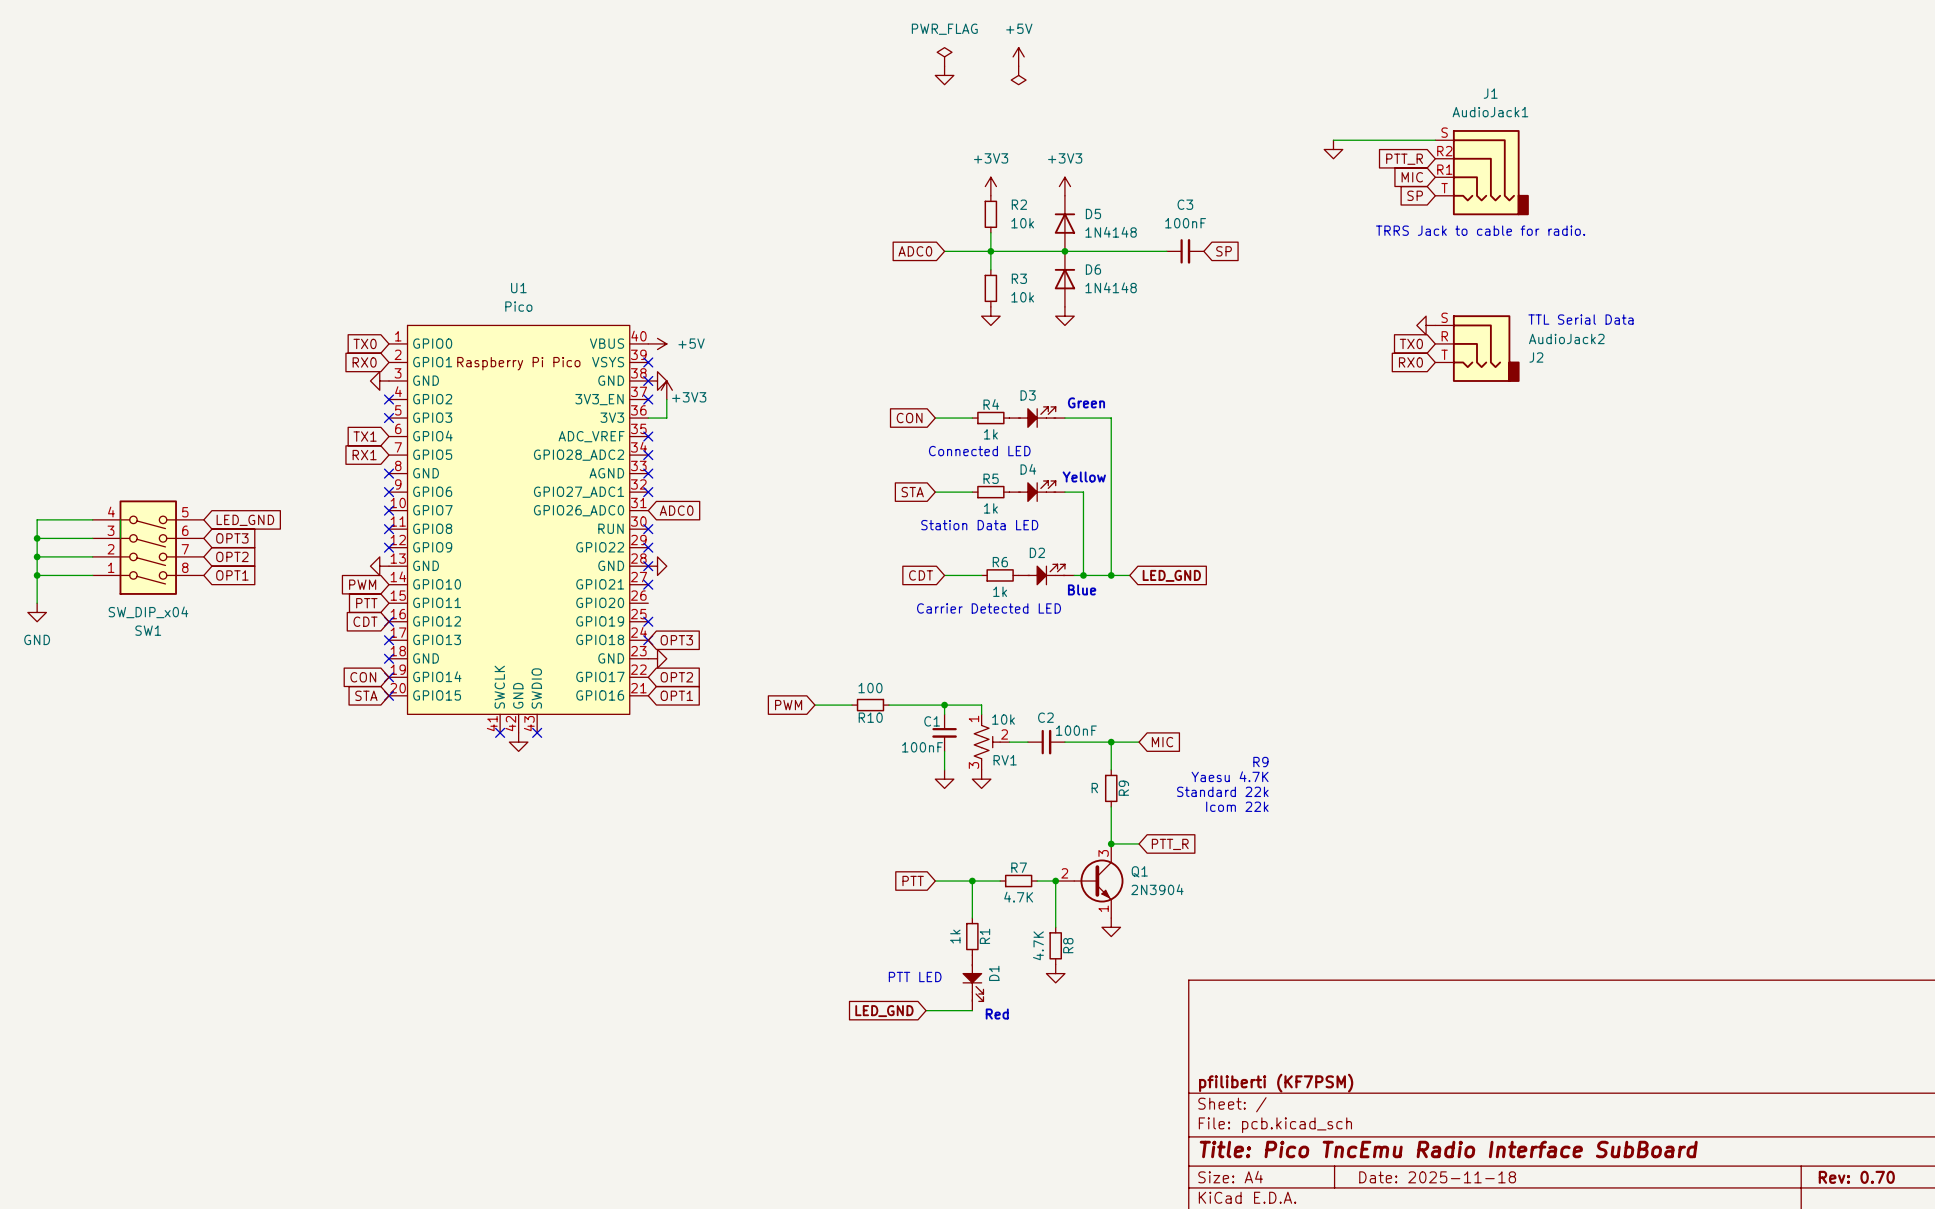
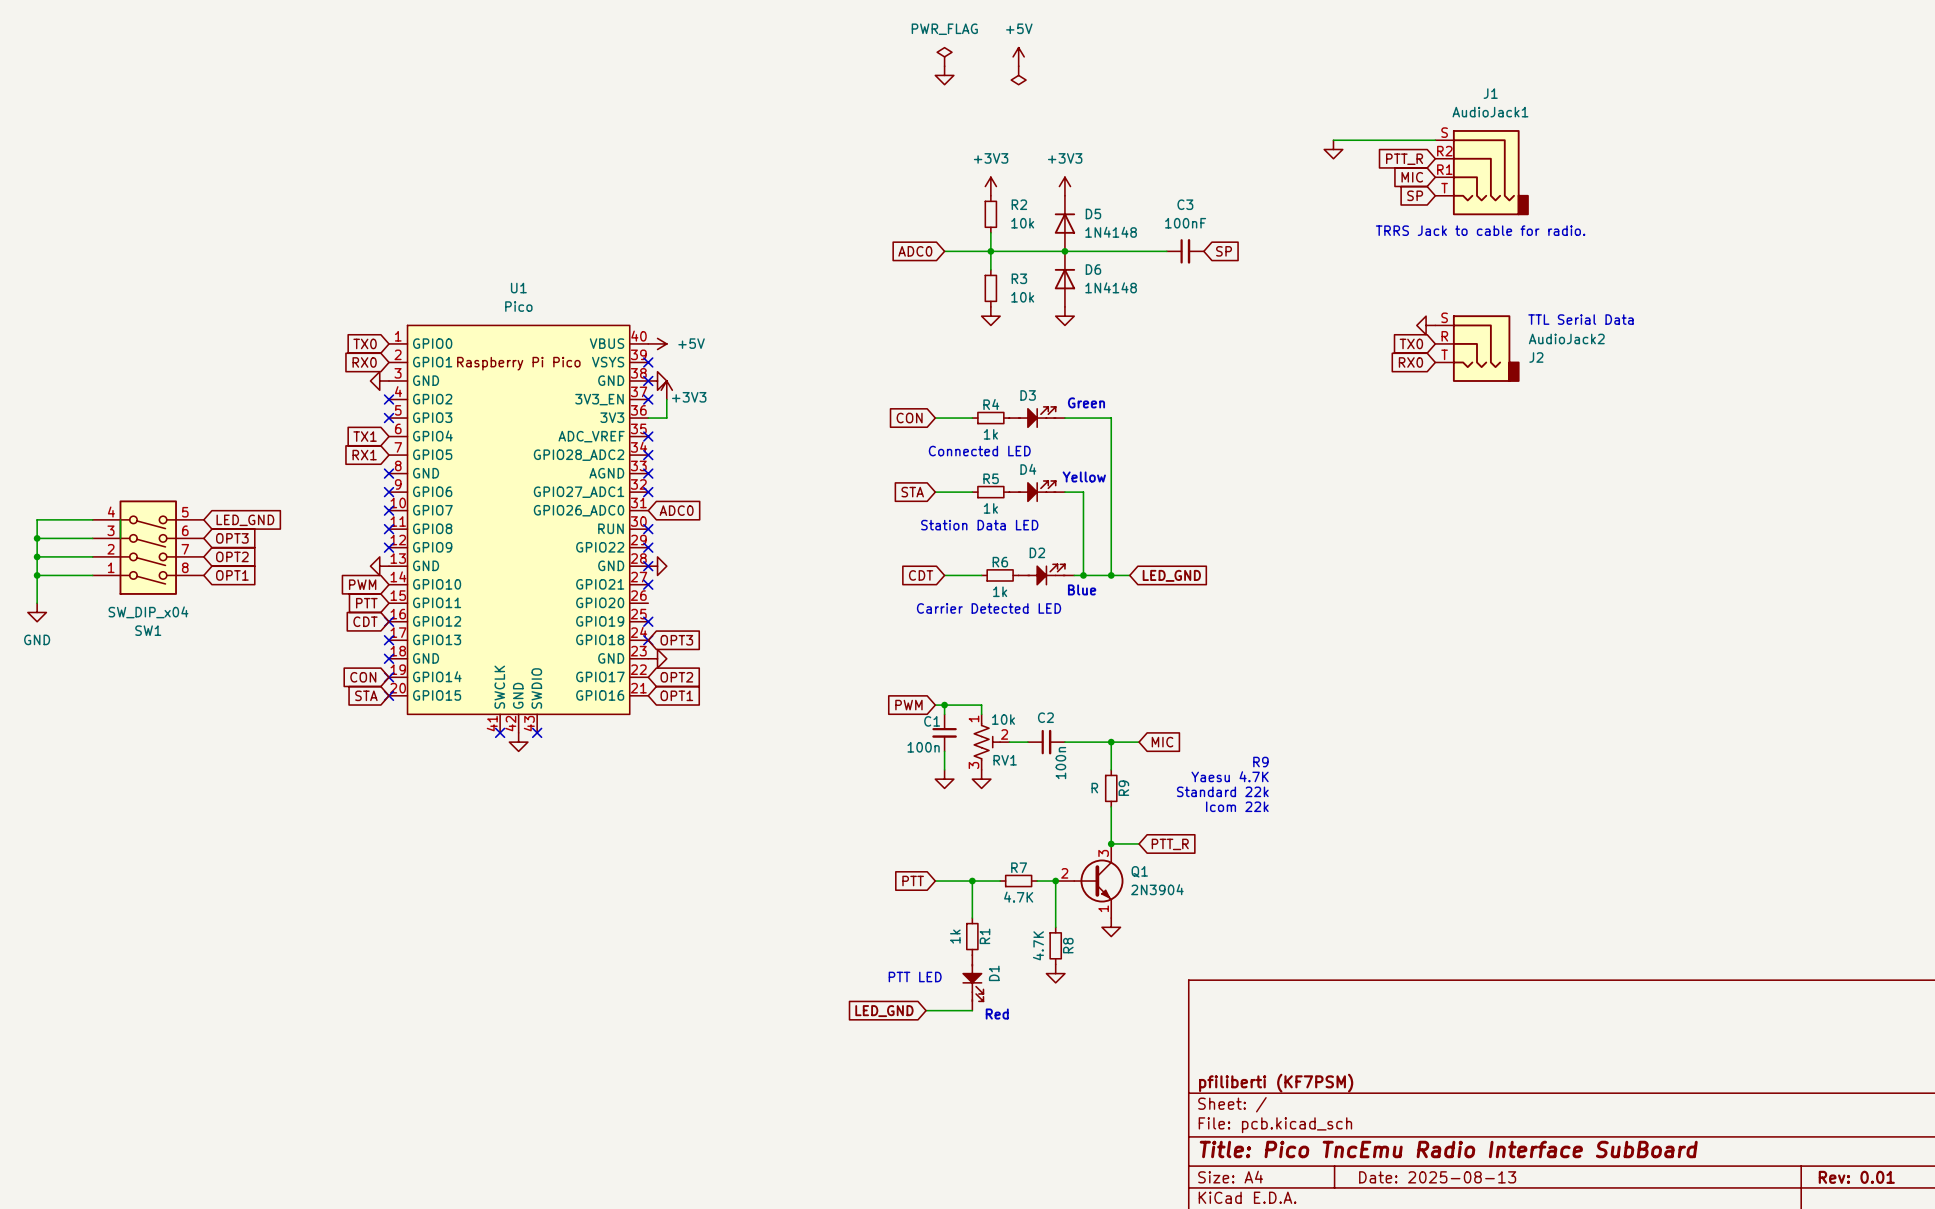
global label position: PWM (788, 705) -> PWM (908, 705)
wire: (814, 705) (851, 705) -> none
R10: 100 (870, 705) -> none
wire: (889, 705) (935, 705) -> none
C2 value: 100nF (1076, 730) -> 100n (1060, 763)
C1 value: 100nF (922, 747) -> 100n (923, 747)
title block: Date: 2025-11-18 (1437, 1177) -> Date: 2025-08-13 (1437, 1177)
title block: Rev: 0.70 (1856, 1177) -> Rev: 0.01 (1856, 1177)

